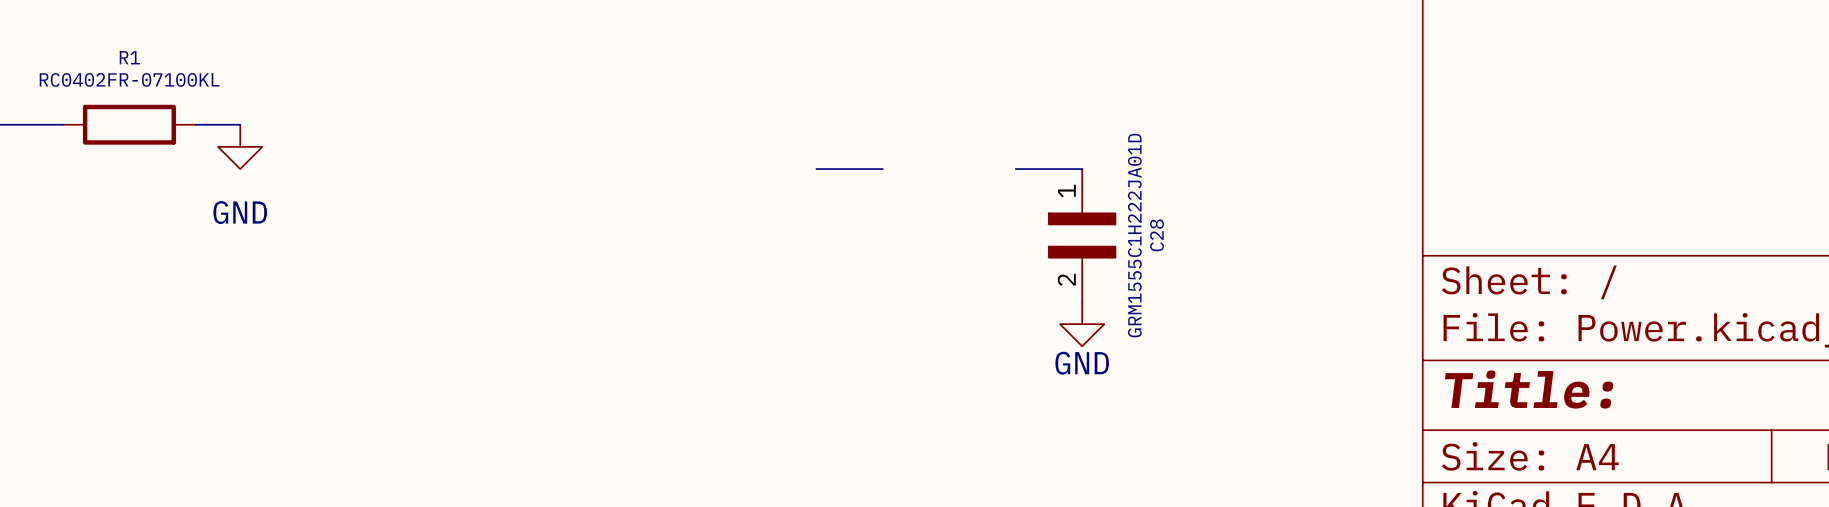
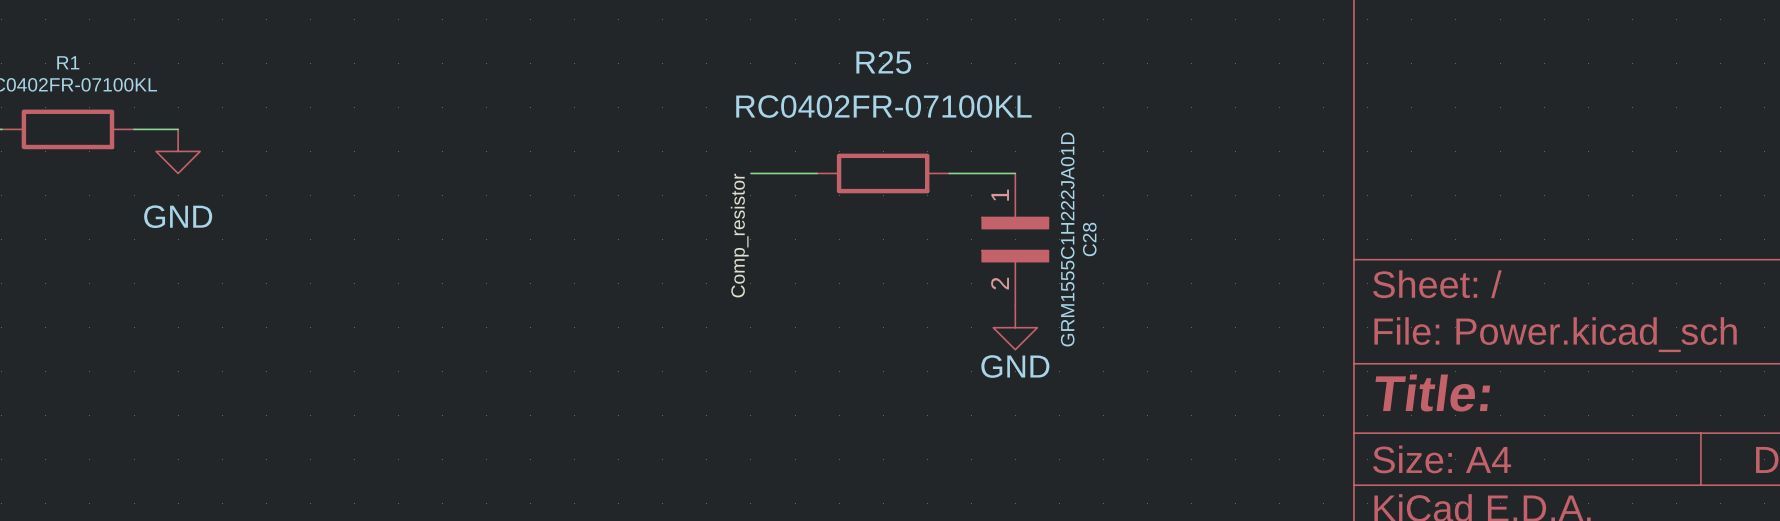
R25: none -> RC0402FR-07100KL (883, 173)
label: none -> Comp_resistor (739, 235)

